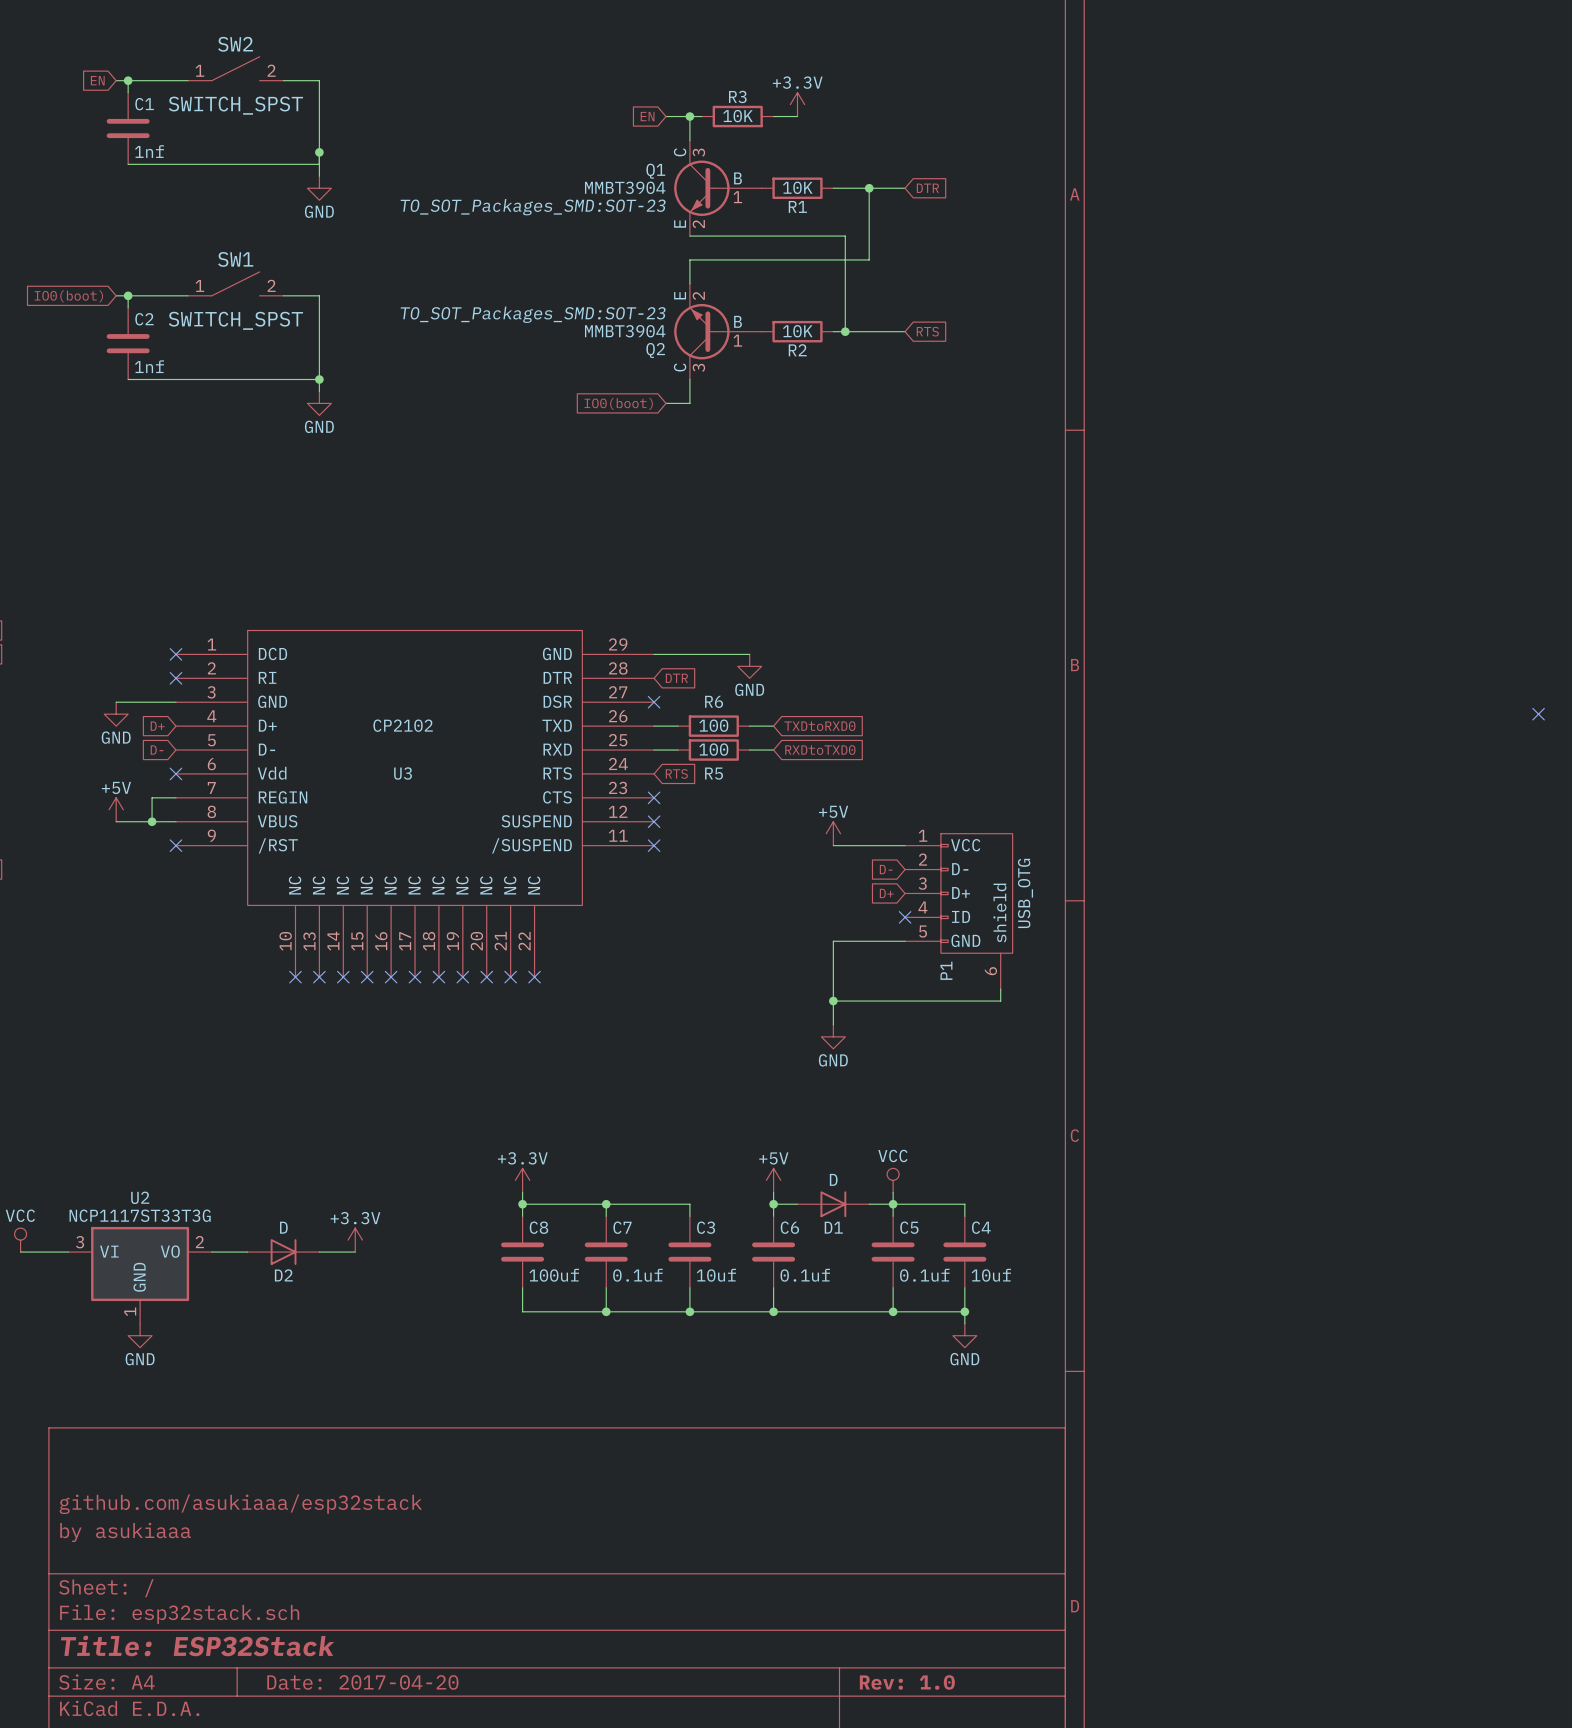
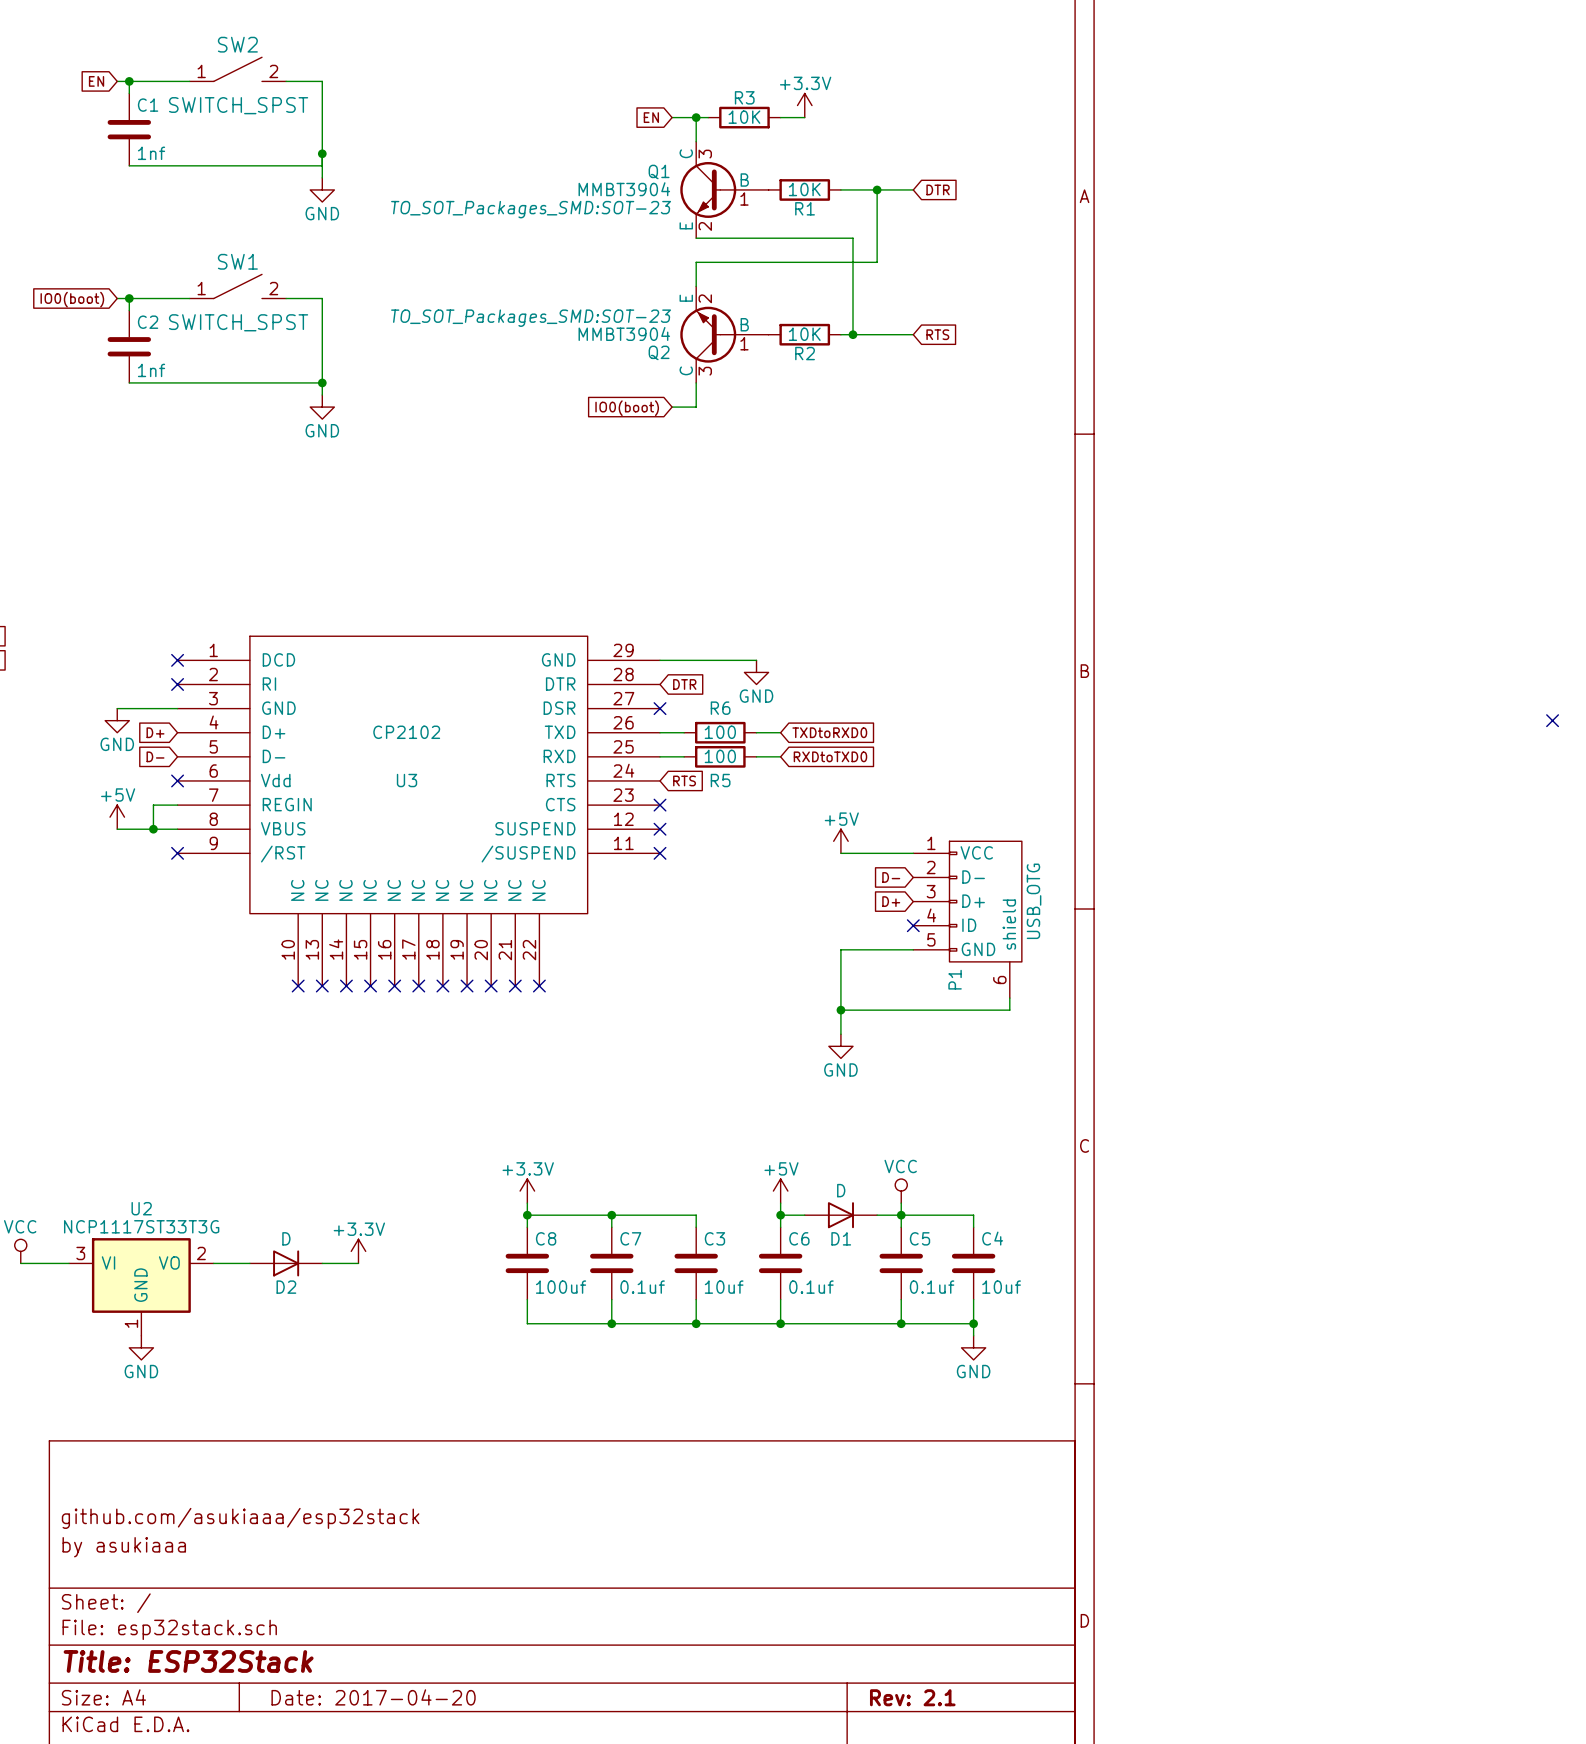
title block: Rev: 1.0 (907, 1682) -> Rev: 2.1 (912, 1697)

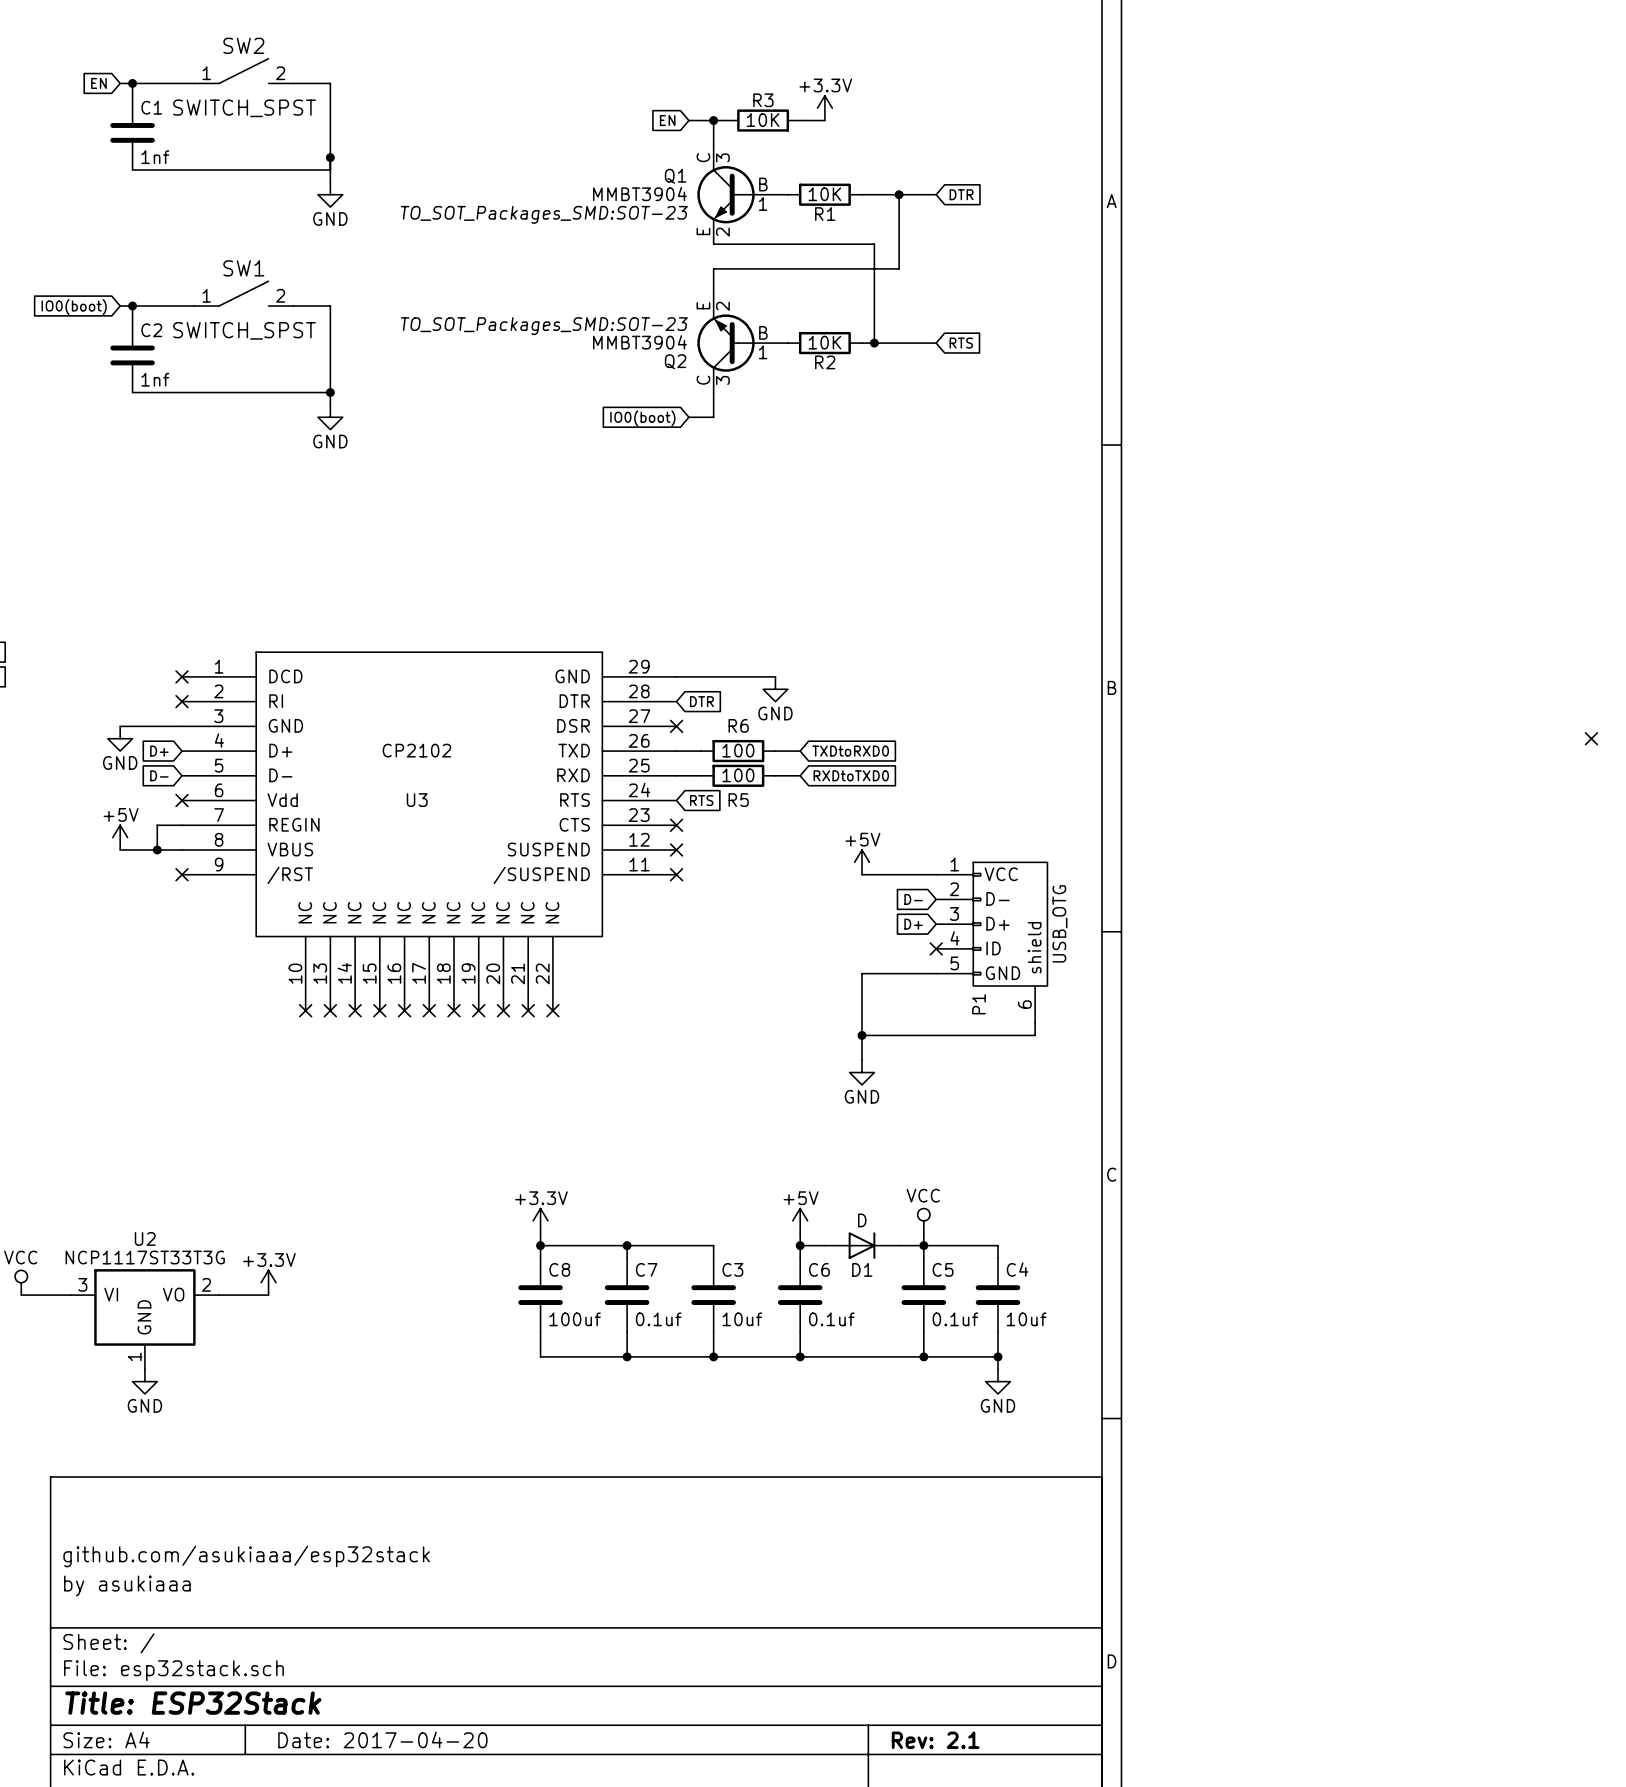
power symbol position: +3.3V (358, 1251) -> +3.3V (268, 1282)
D2: D (286, 1263) -> none
wire: (322, 1263) (358, 1263) -> none

